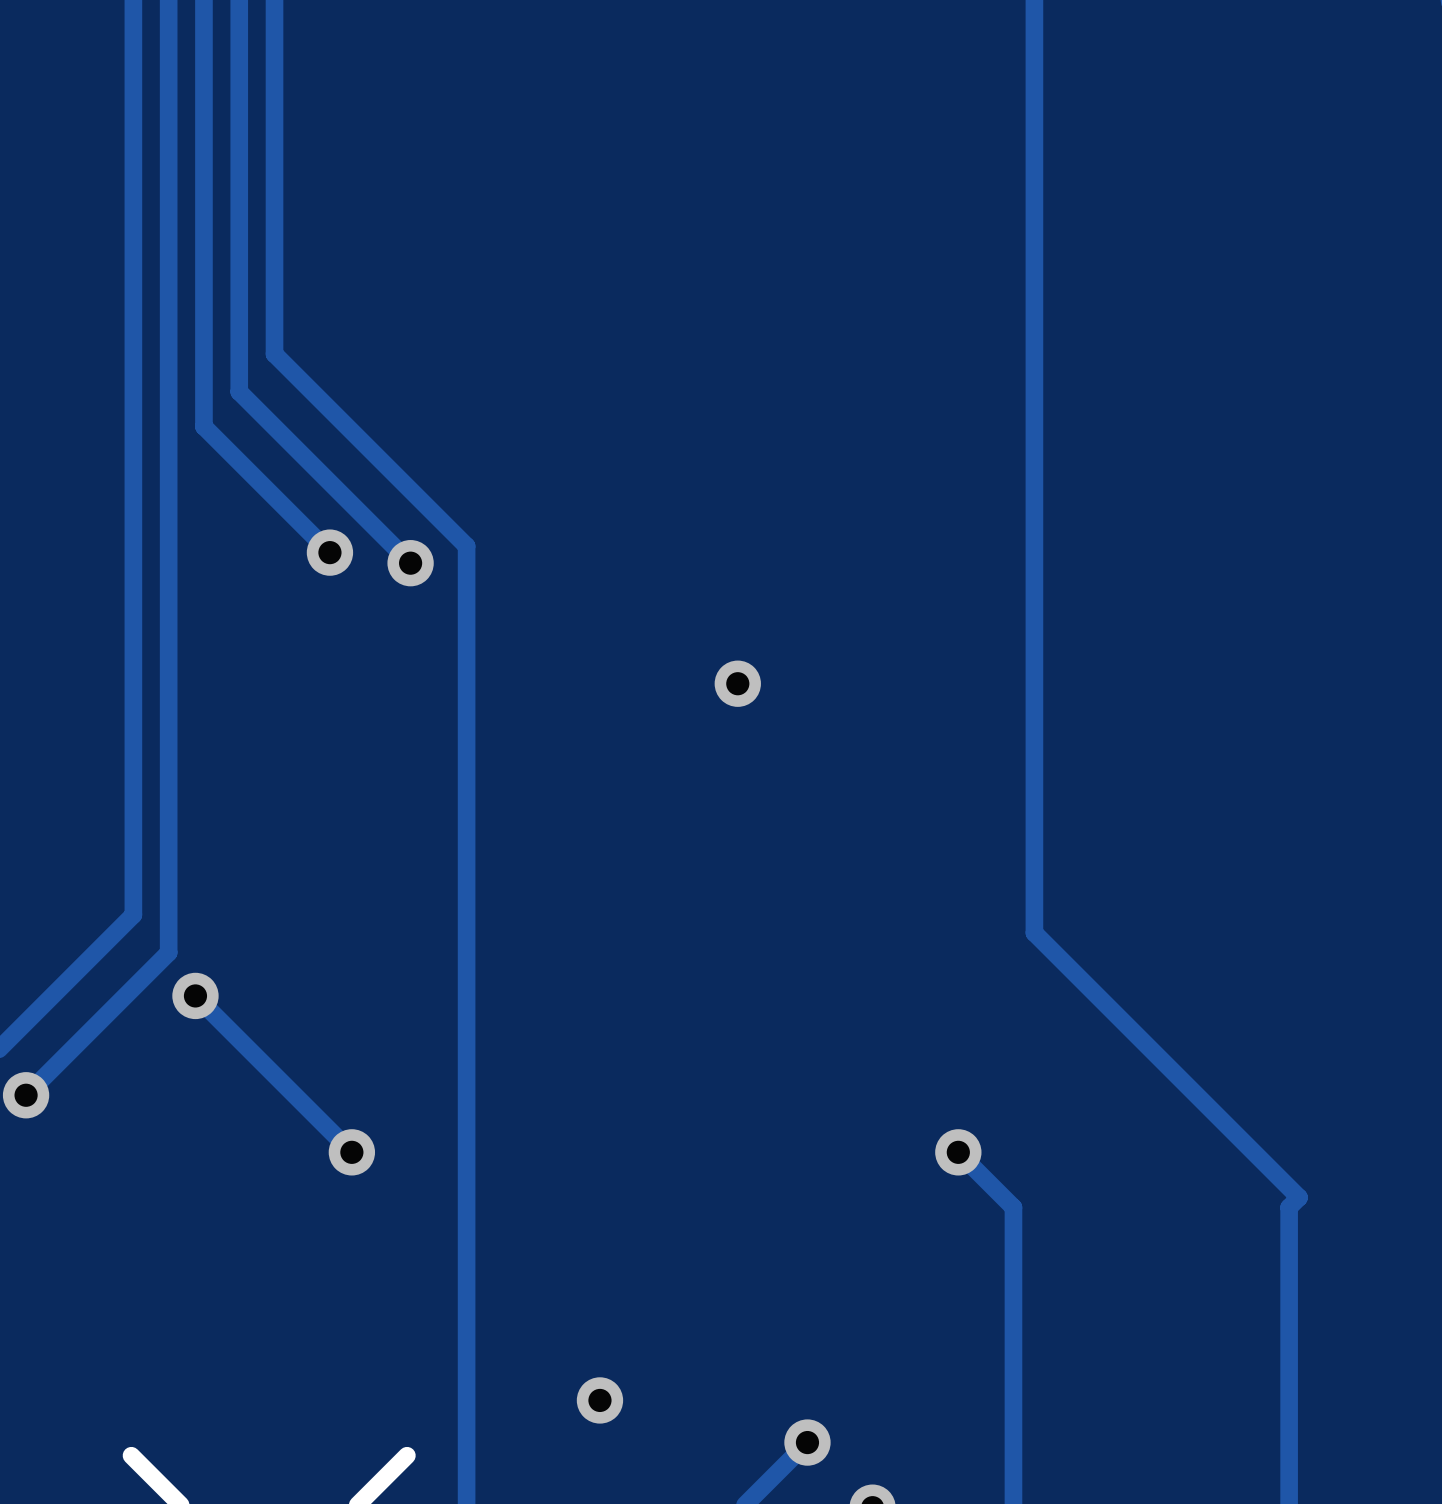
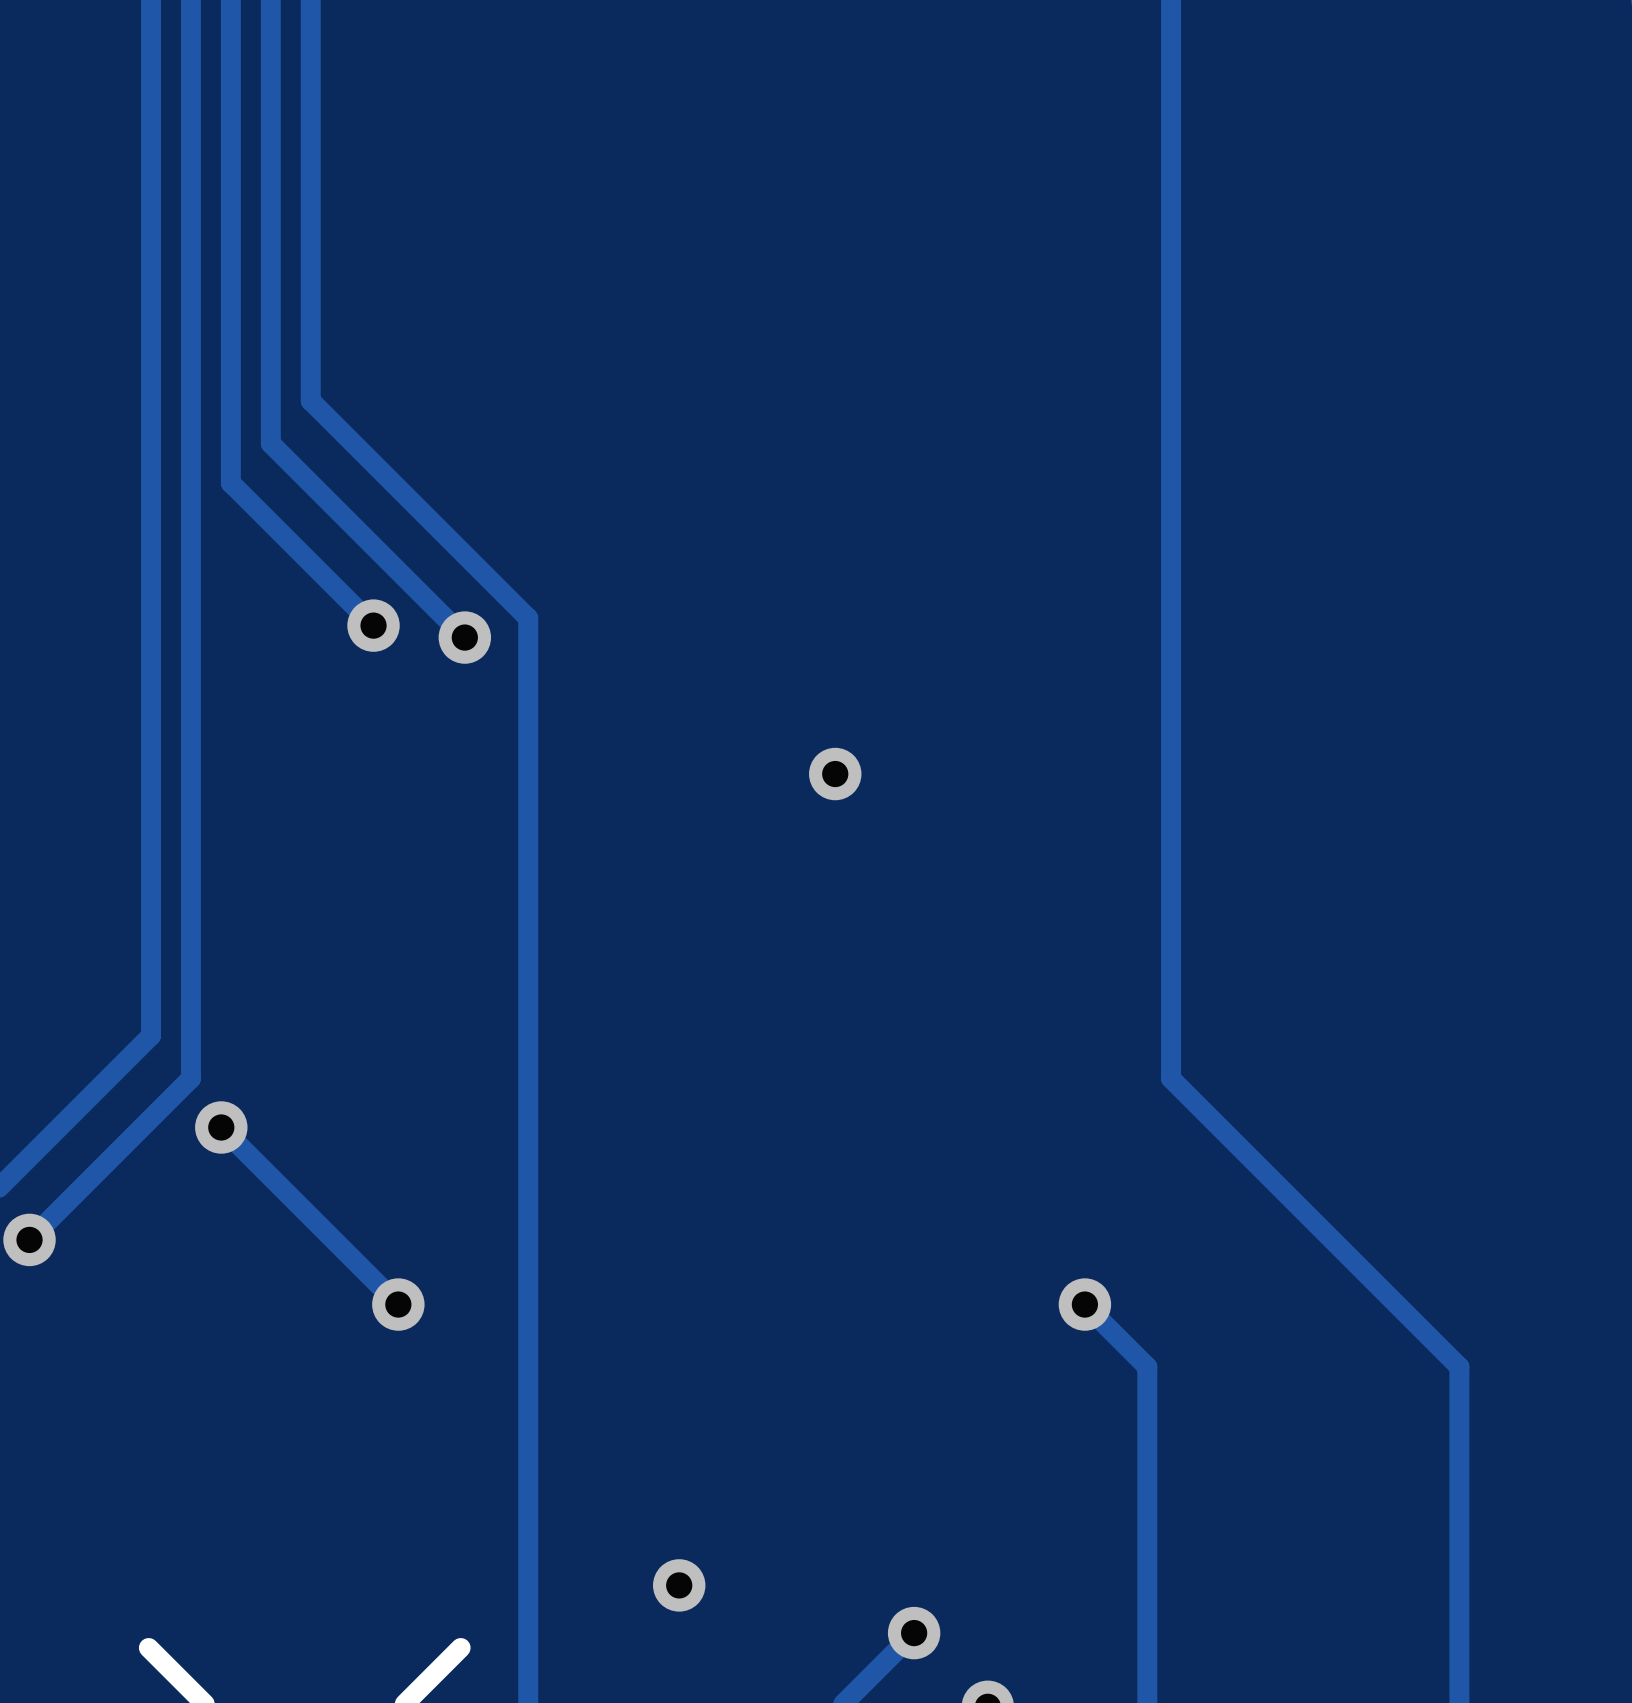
track: (1034, 932) (1299, 1197) (1289, 1207) -> (1171, 1056) (1171, 1078) (1459, 1366)

